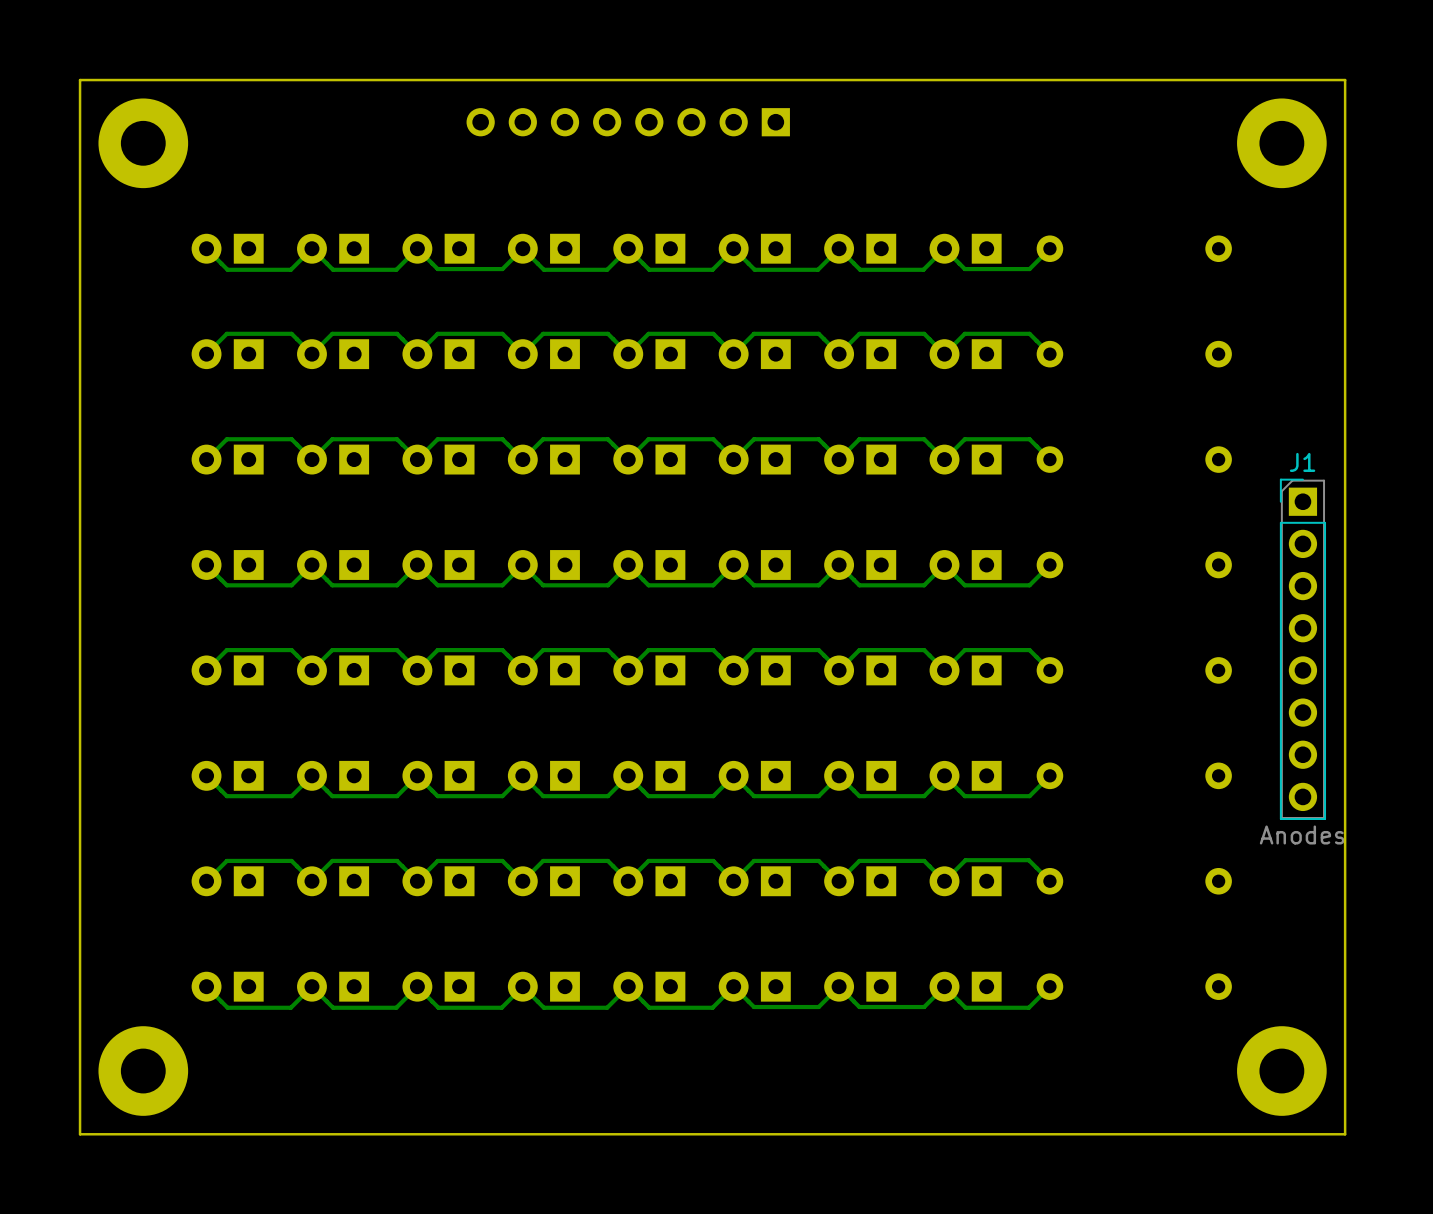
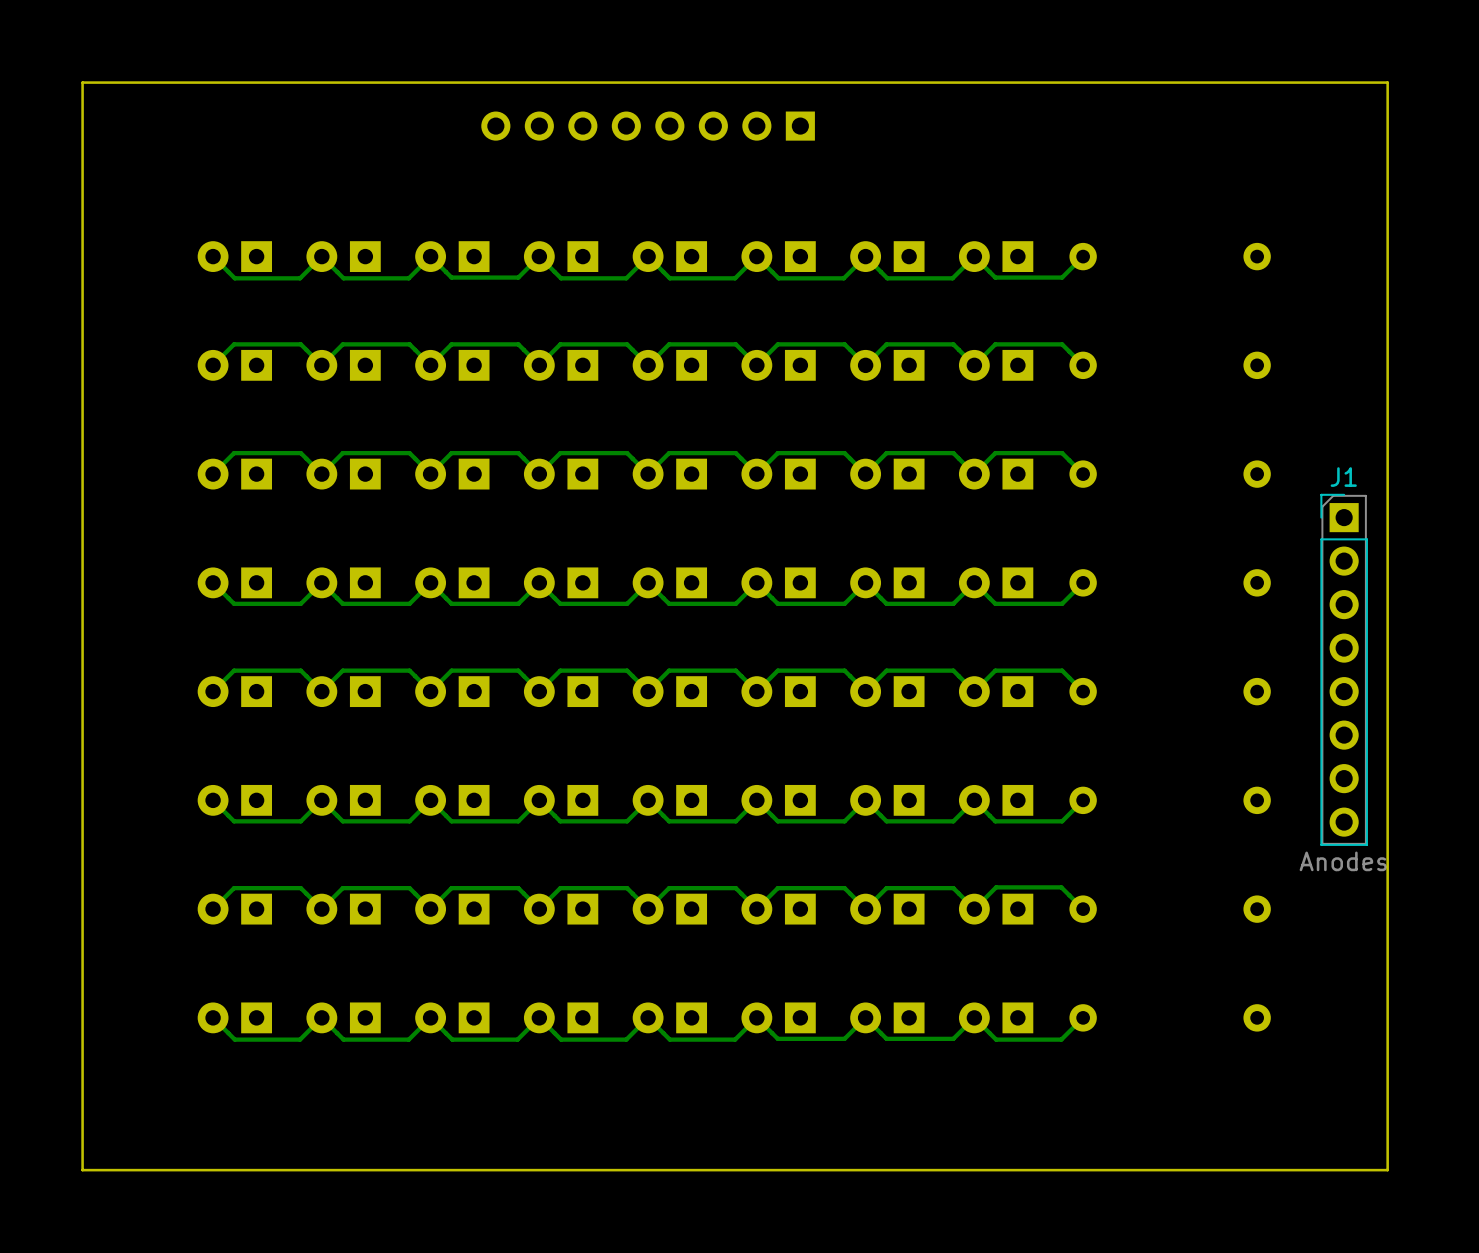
part: (143, 143) -> none
part: (1281, 143) -> none
part: (143, 1071) -> none
part: (1281, 1071) -> none

